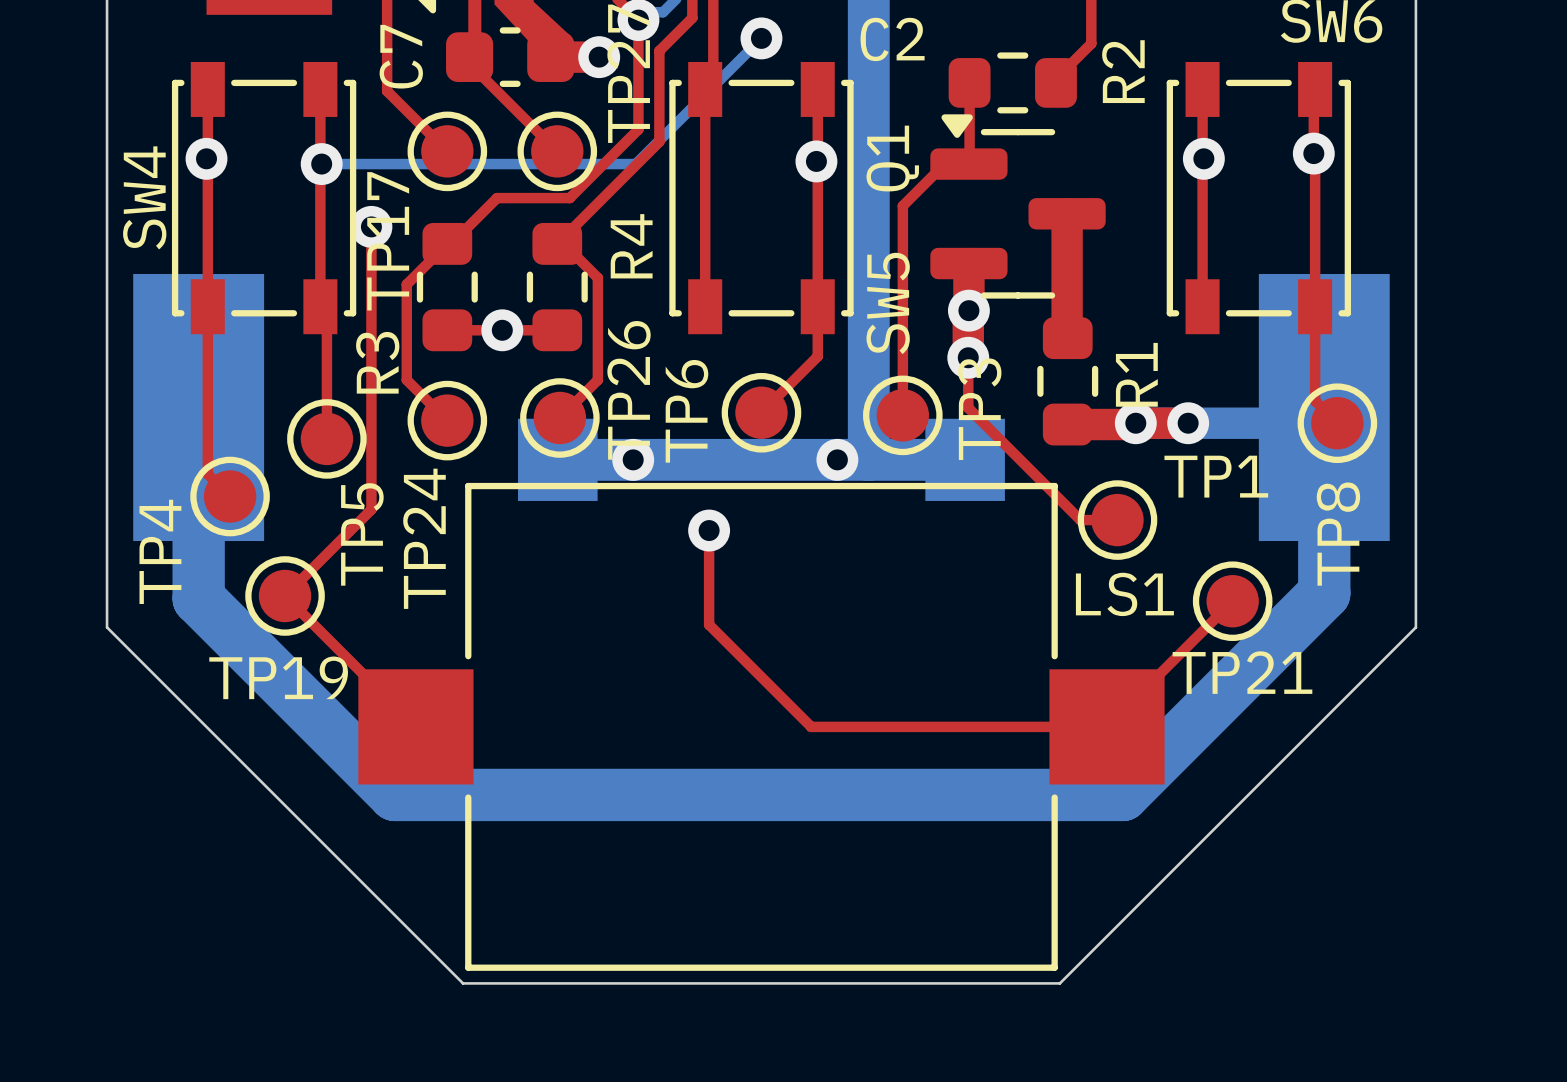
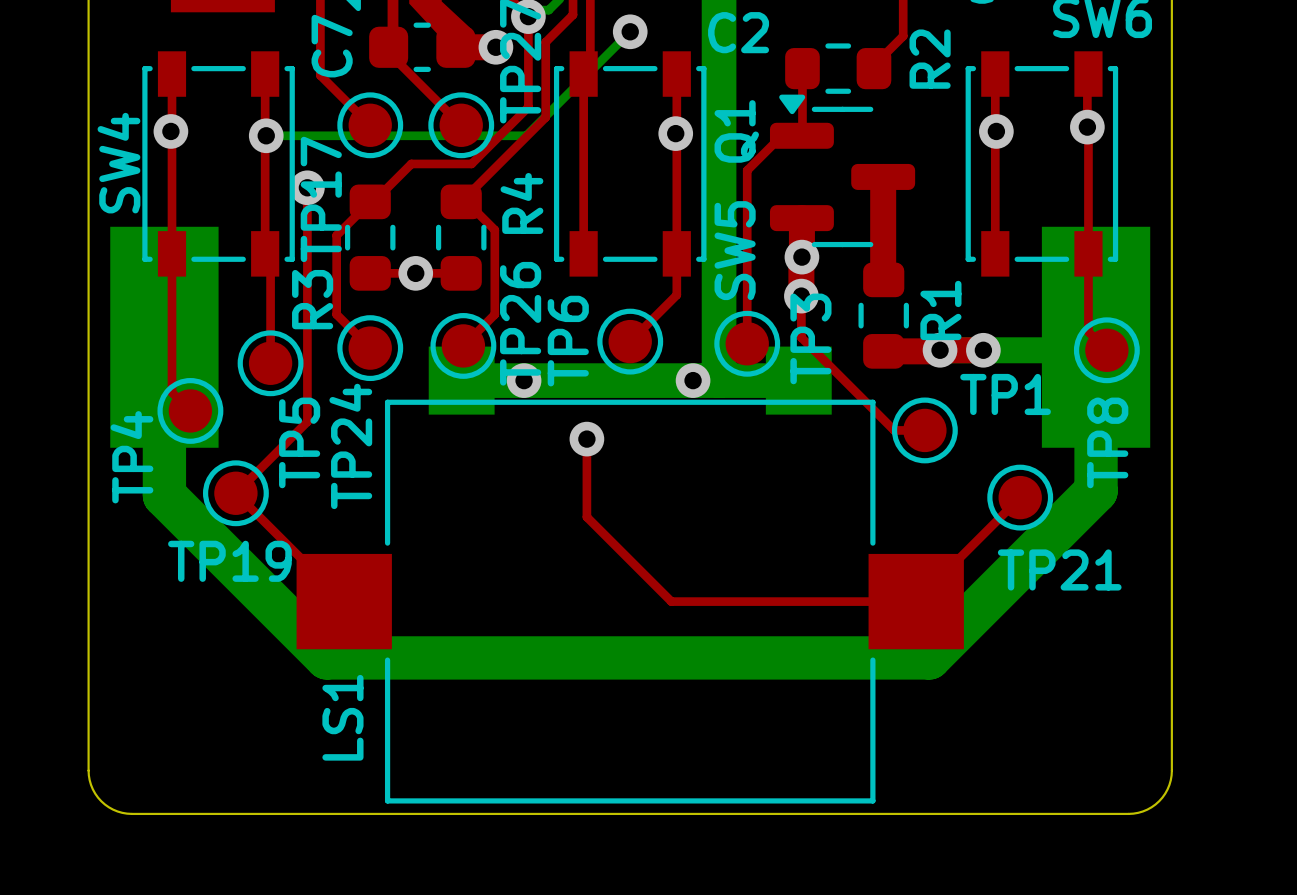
LS1 name rotation: 0° (1124, 594) -> 90° counterclockwise (342, 717)
LS1 name position: LS1 (1124, 594) -> LS1 (342, 717)
board edge: (107, 627) (463, 983) -> (88, 519) (88, 770) (91, 784) (101, 801) (113, 809) (131, 813) (383, 813)
board edge: (1415, 627) (1059, 983) -> (1171, 519) (1171, 770) (1169, 784) (1159, 801) (1147, 809) (1128, 813) (877, 813)
TP21 name position: TP21 (1242, 672) -> TP21 (1059, 569)

